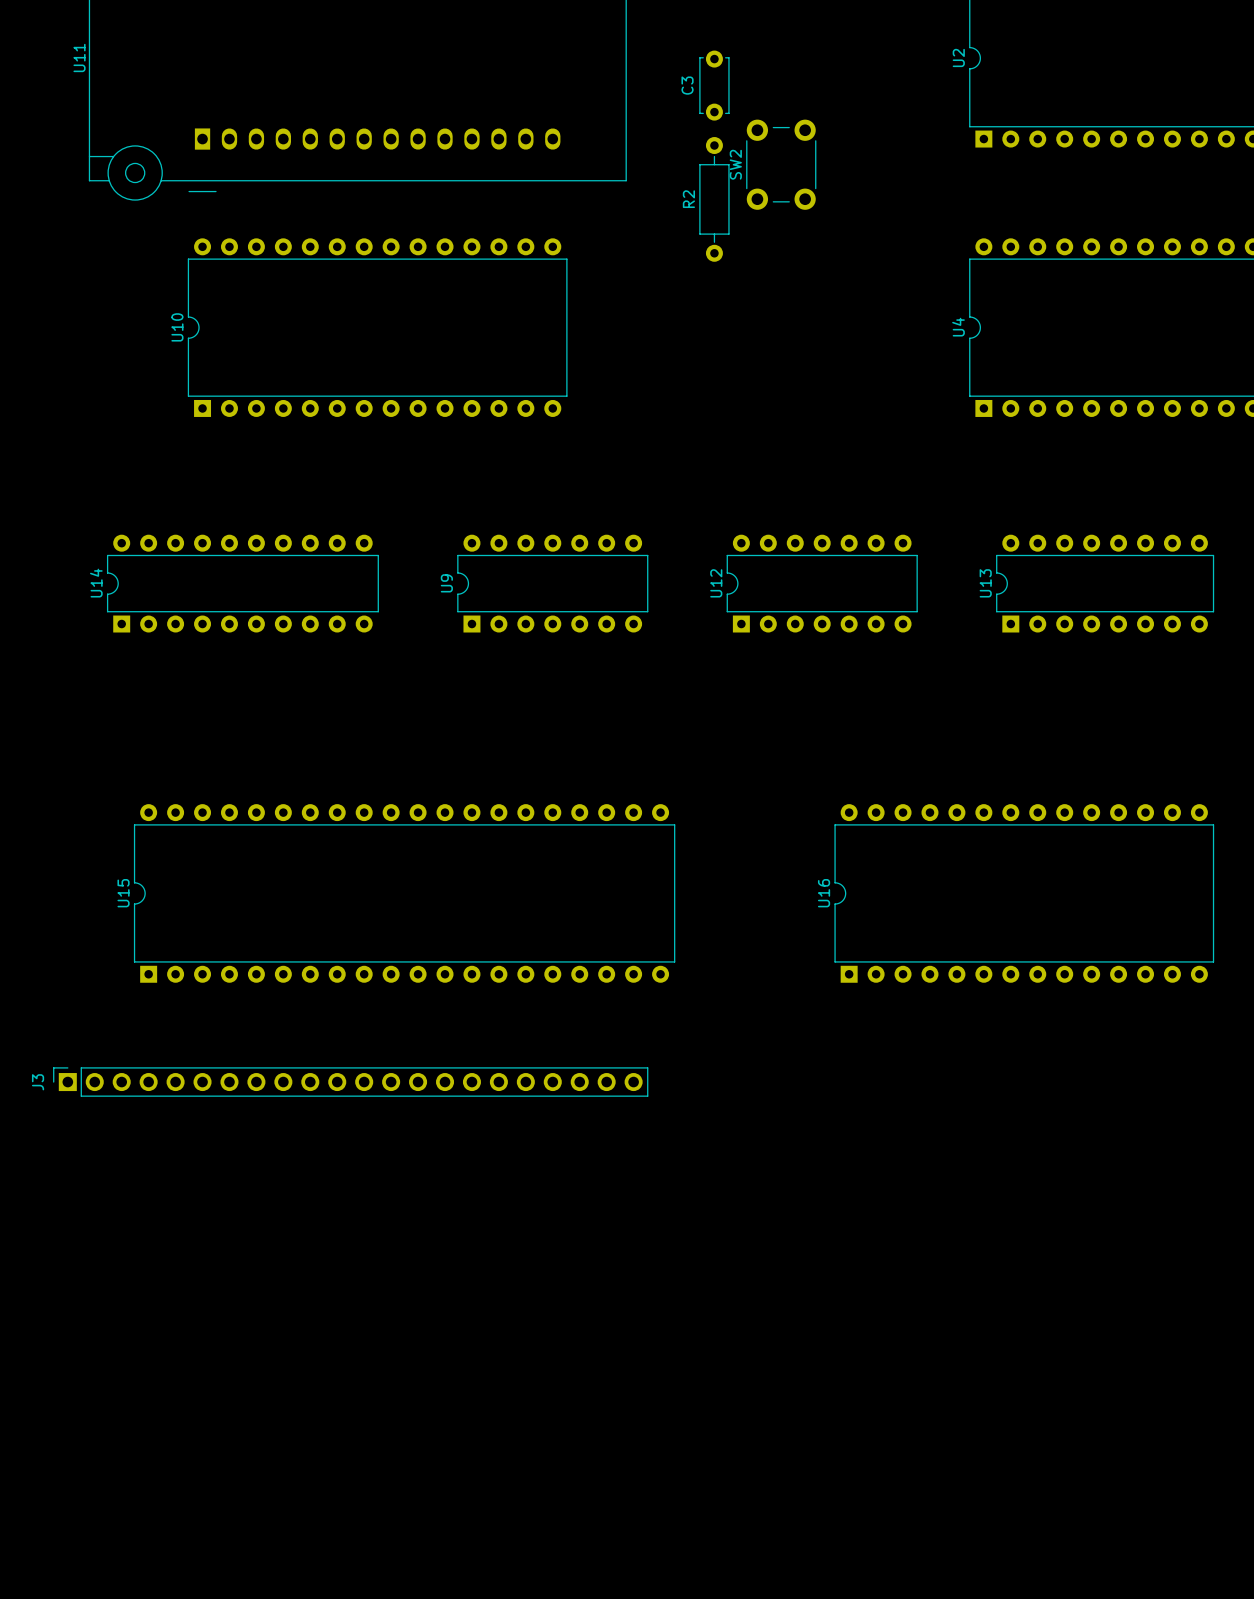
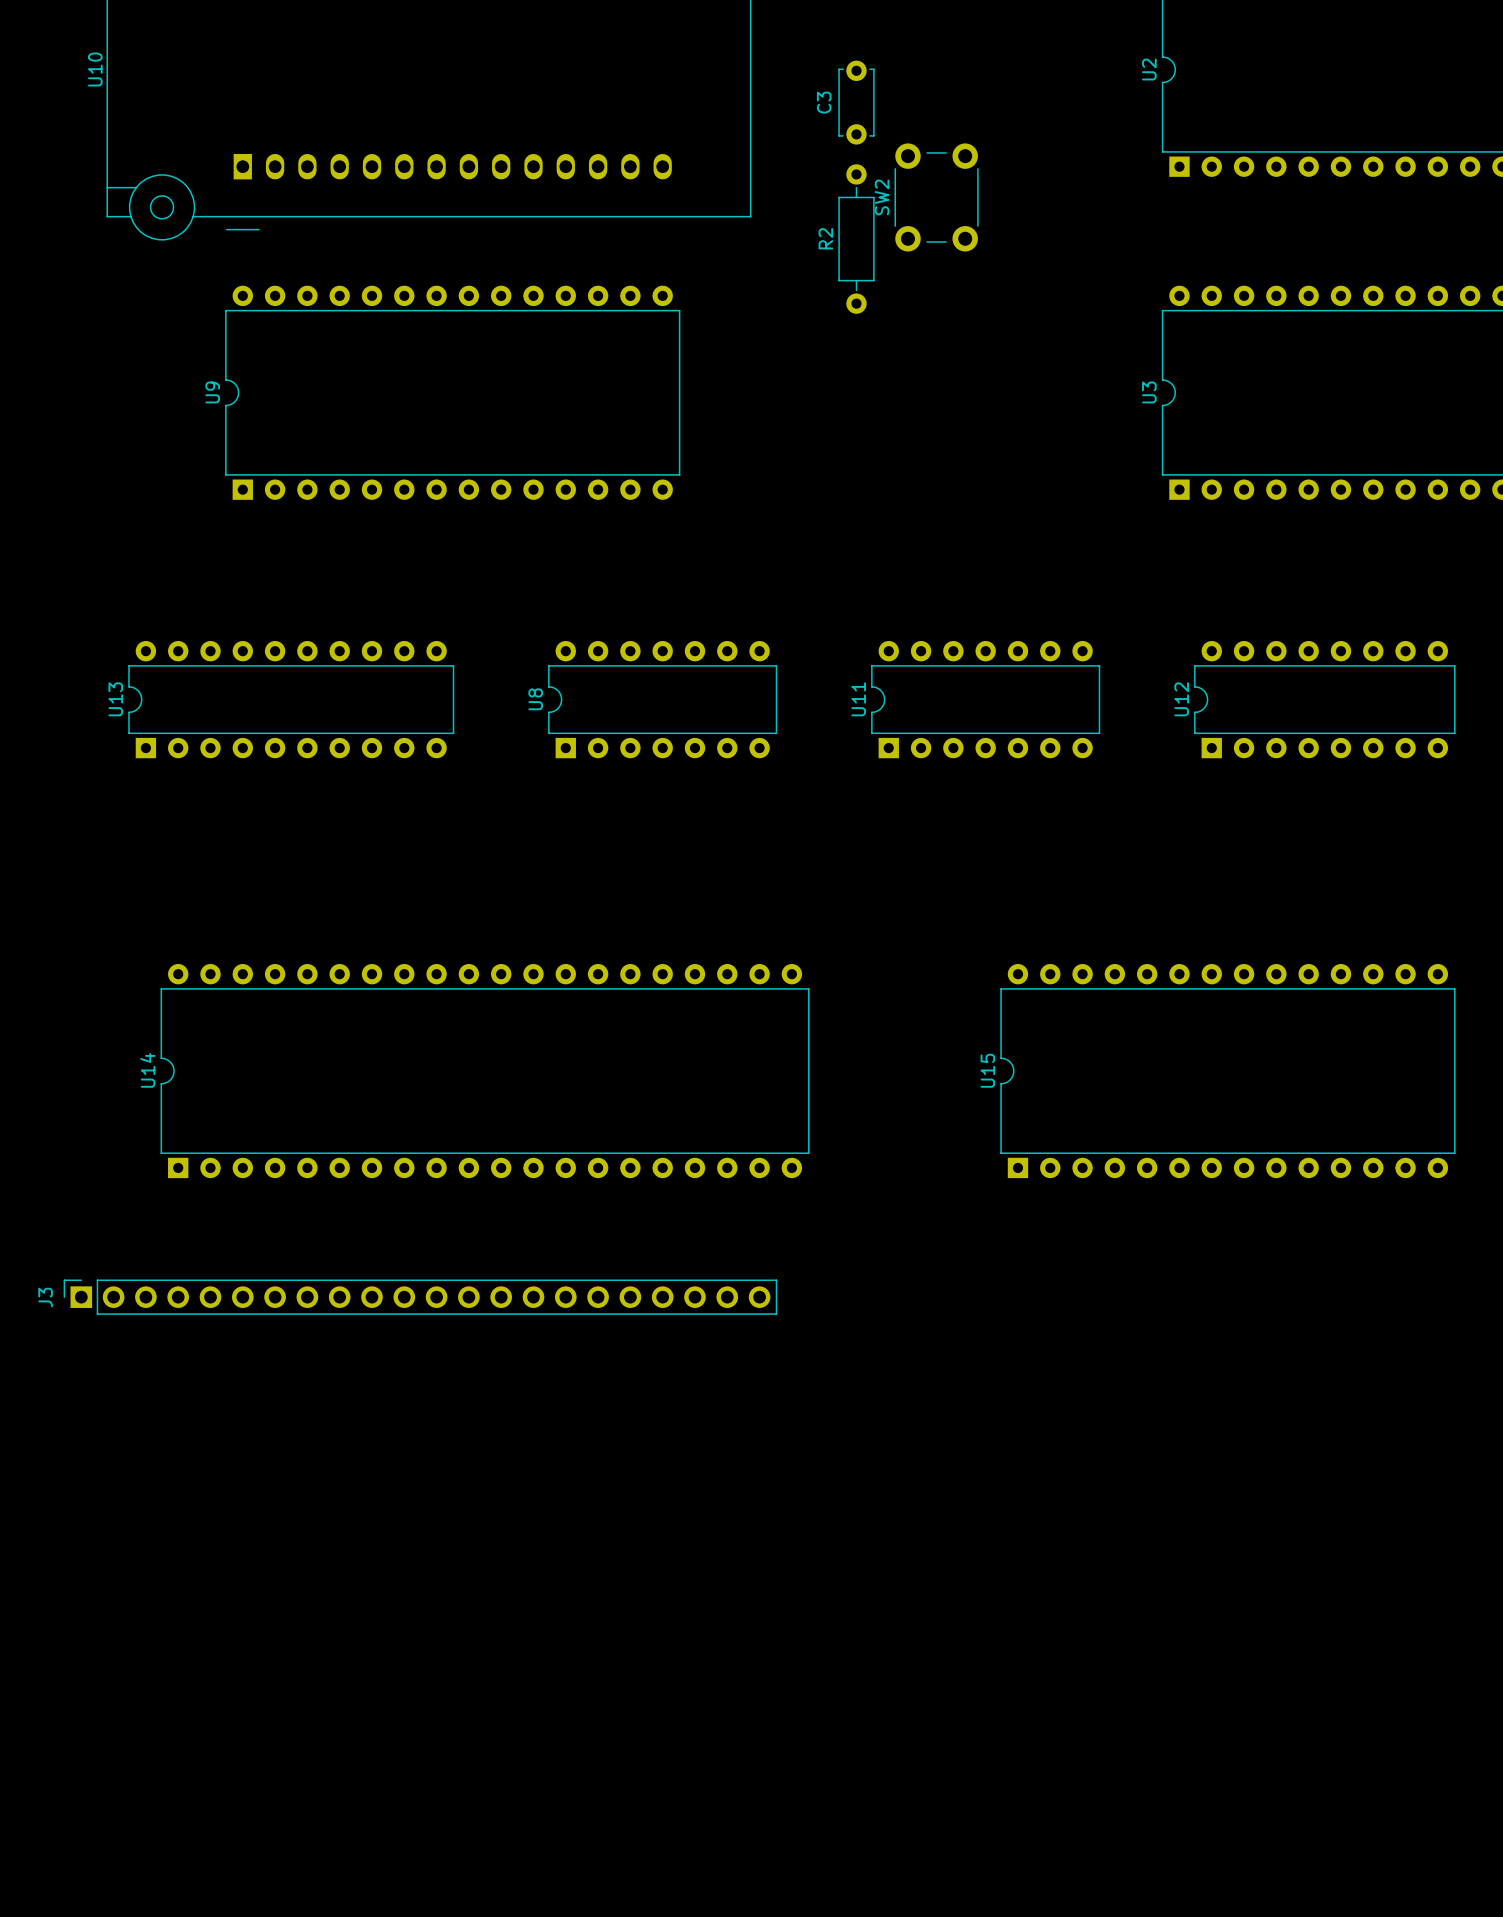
U11 name: U11 (79, 57) -> U10 (95, 69)
U10 name: U10 (177, 327) -> U9 (212, 392)
U4 name: U4 (958, 327) -> U3 (1149, 392)
U14 name: U14 (96, 583) -> U13 (115, 699)
U9 name: U9 (446, 583) -> U8 (535, 699)
U12 name: U12 (716, 583) -> U11 (858, 699)
U13 name: U13 (985, 583) -> U12 (1181, 699)
U15 name: U15 (123, 893) -> U14 (147, 1070)
U16 name: U16 (824, 893) -> U15 (987, 1070)

